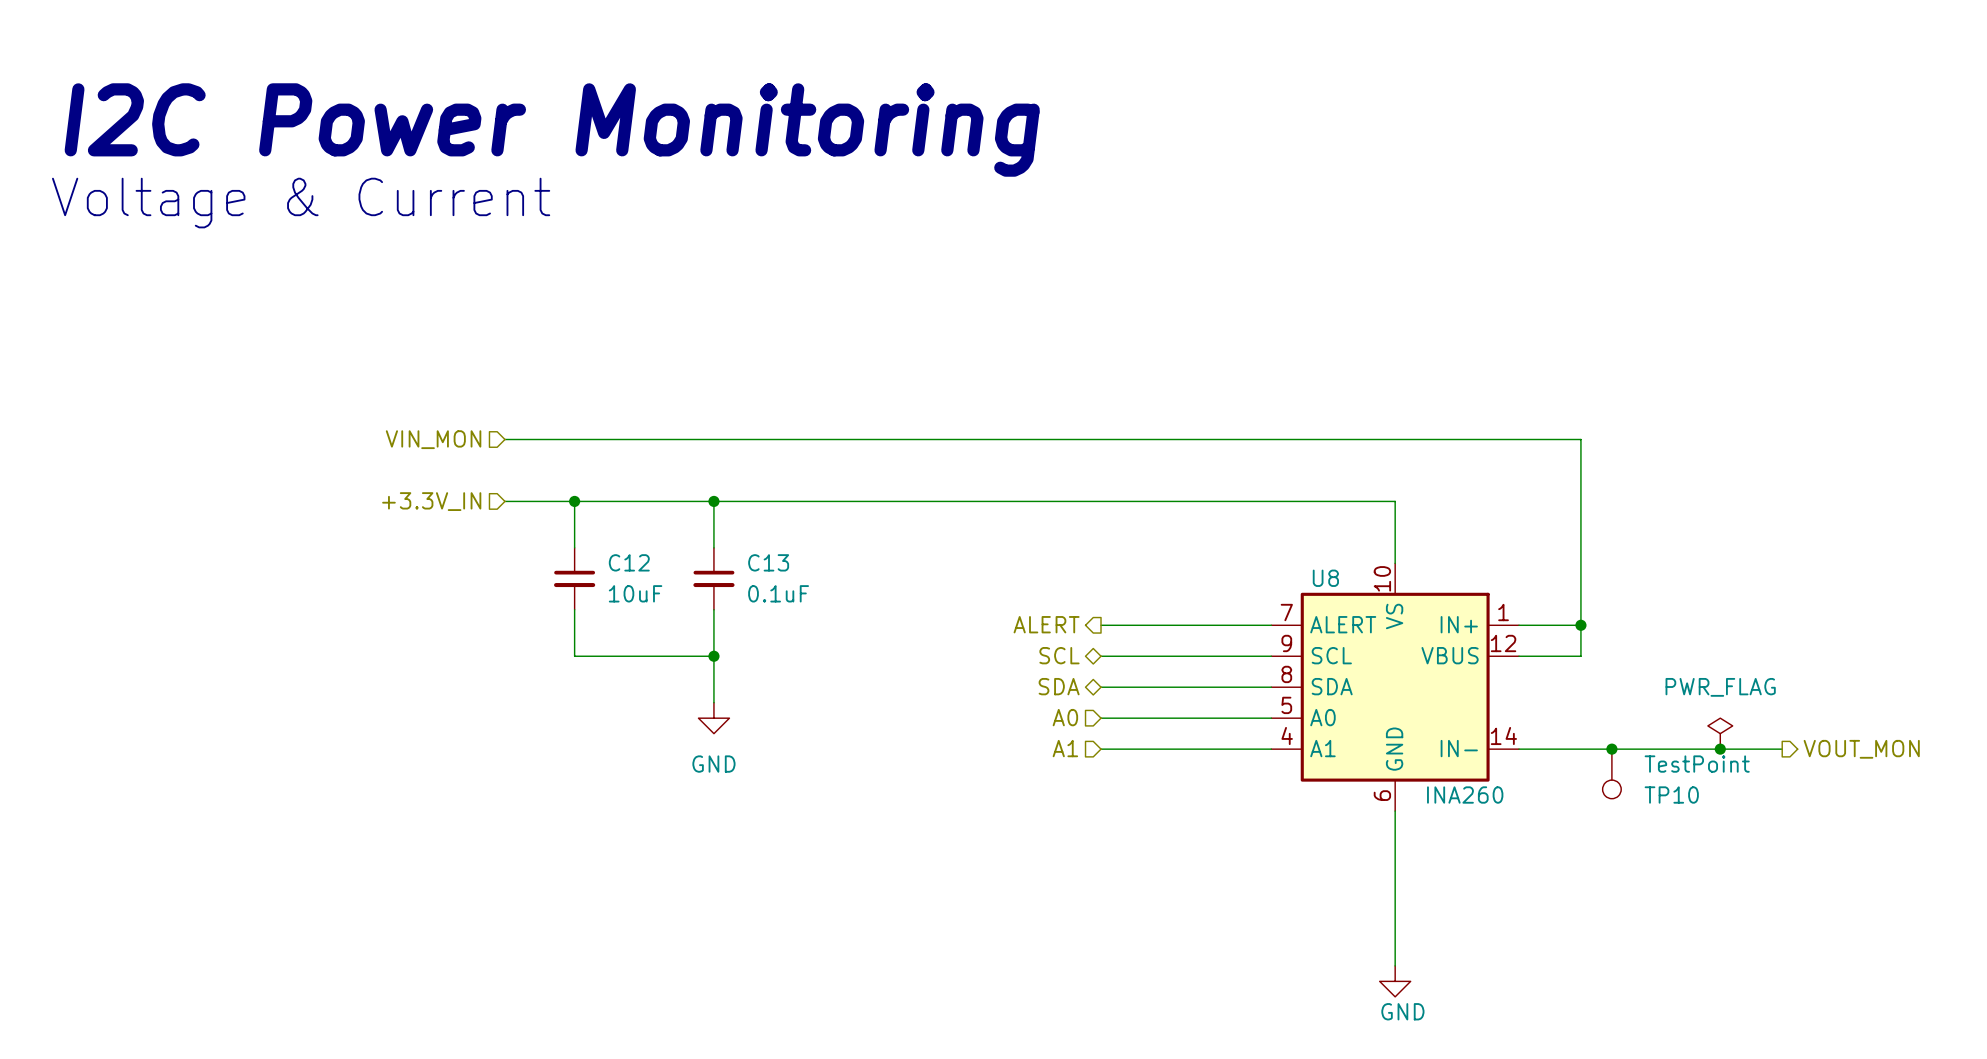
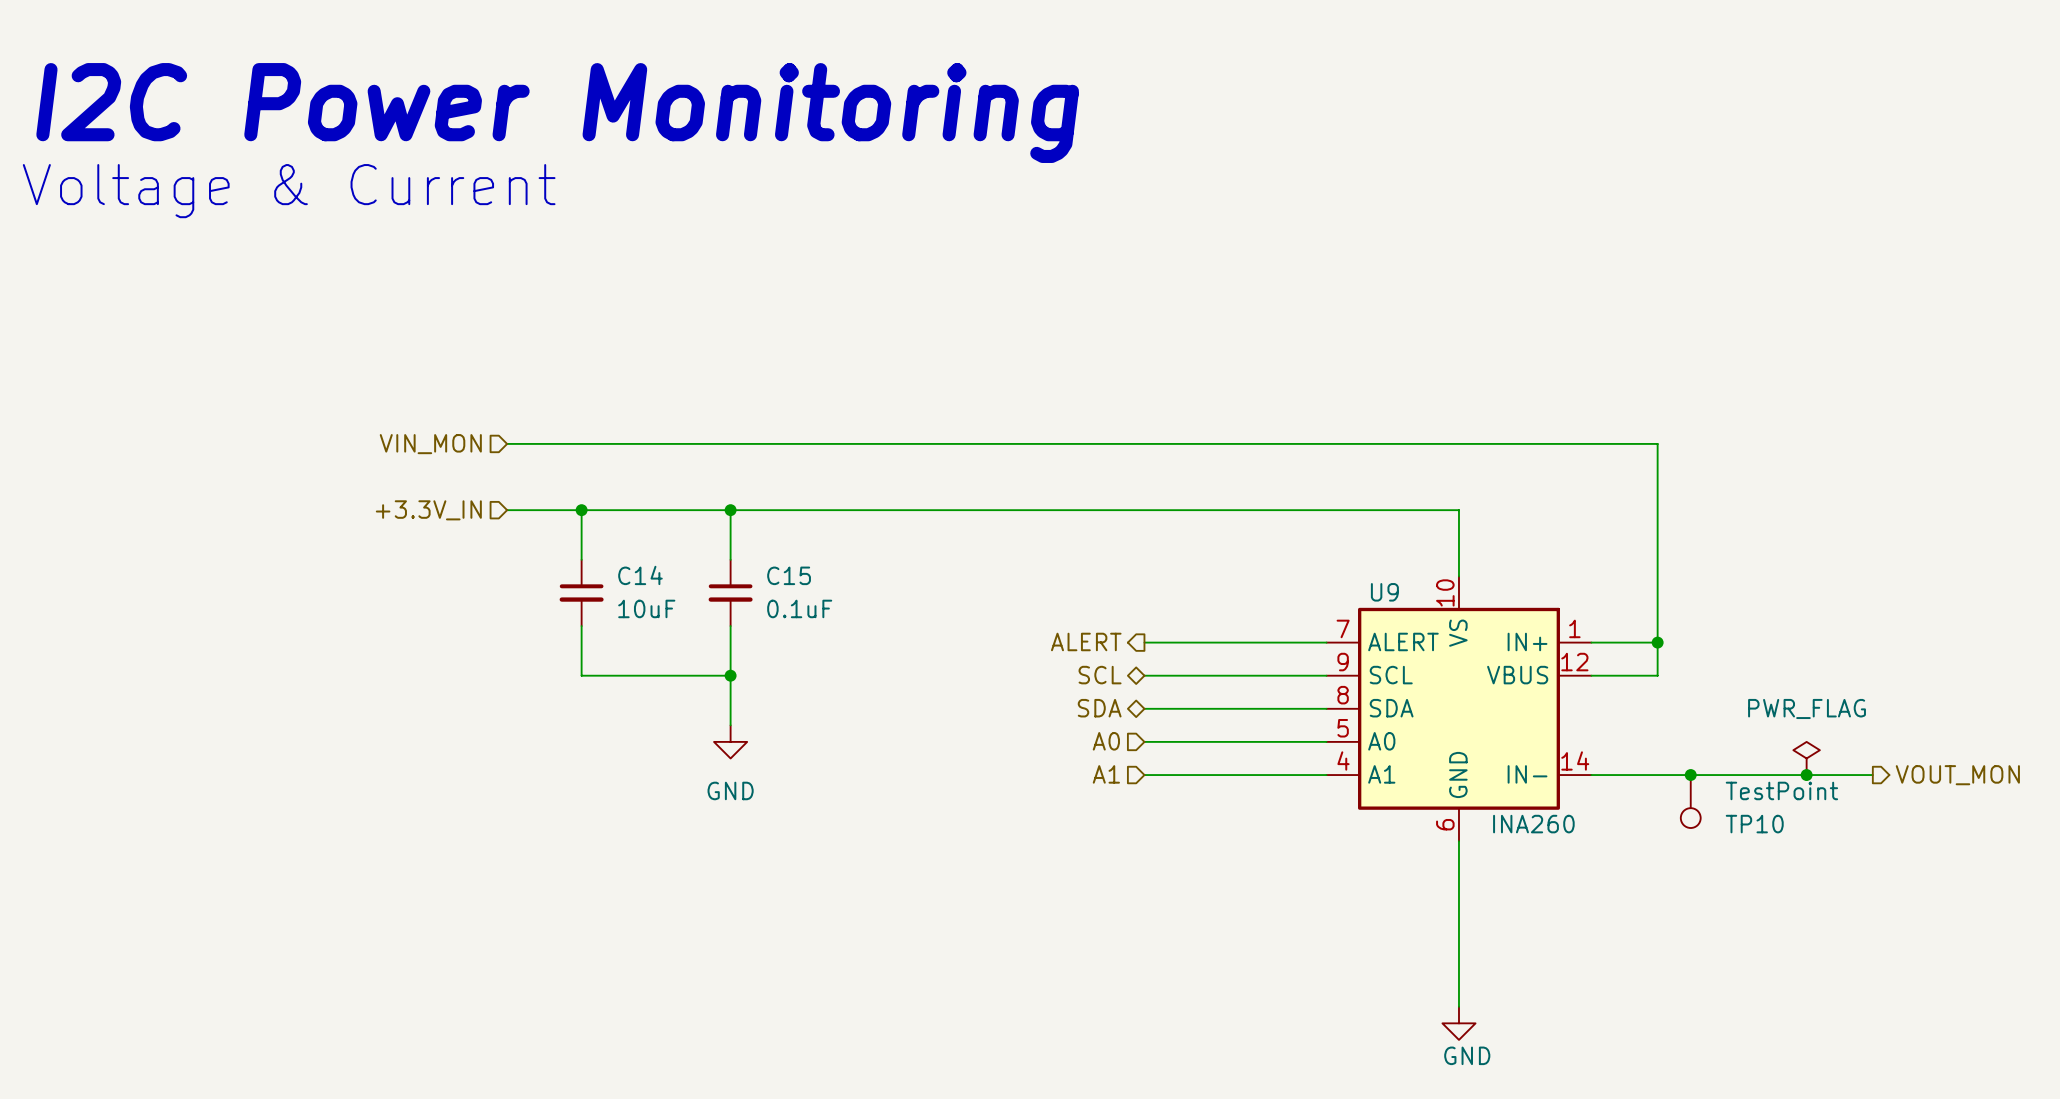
C12 name: C12 (629, 562) -> C14 (640, 575)
C13 name: C13 (768, 562) -> C15 (789, 575)
U8 name: U8 (1325, 578) -> U9 (1384, 592)

